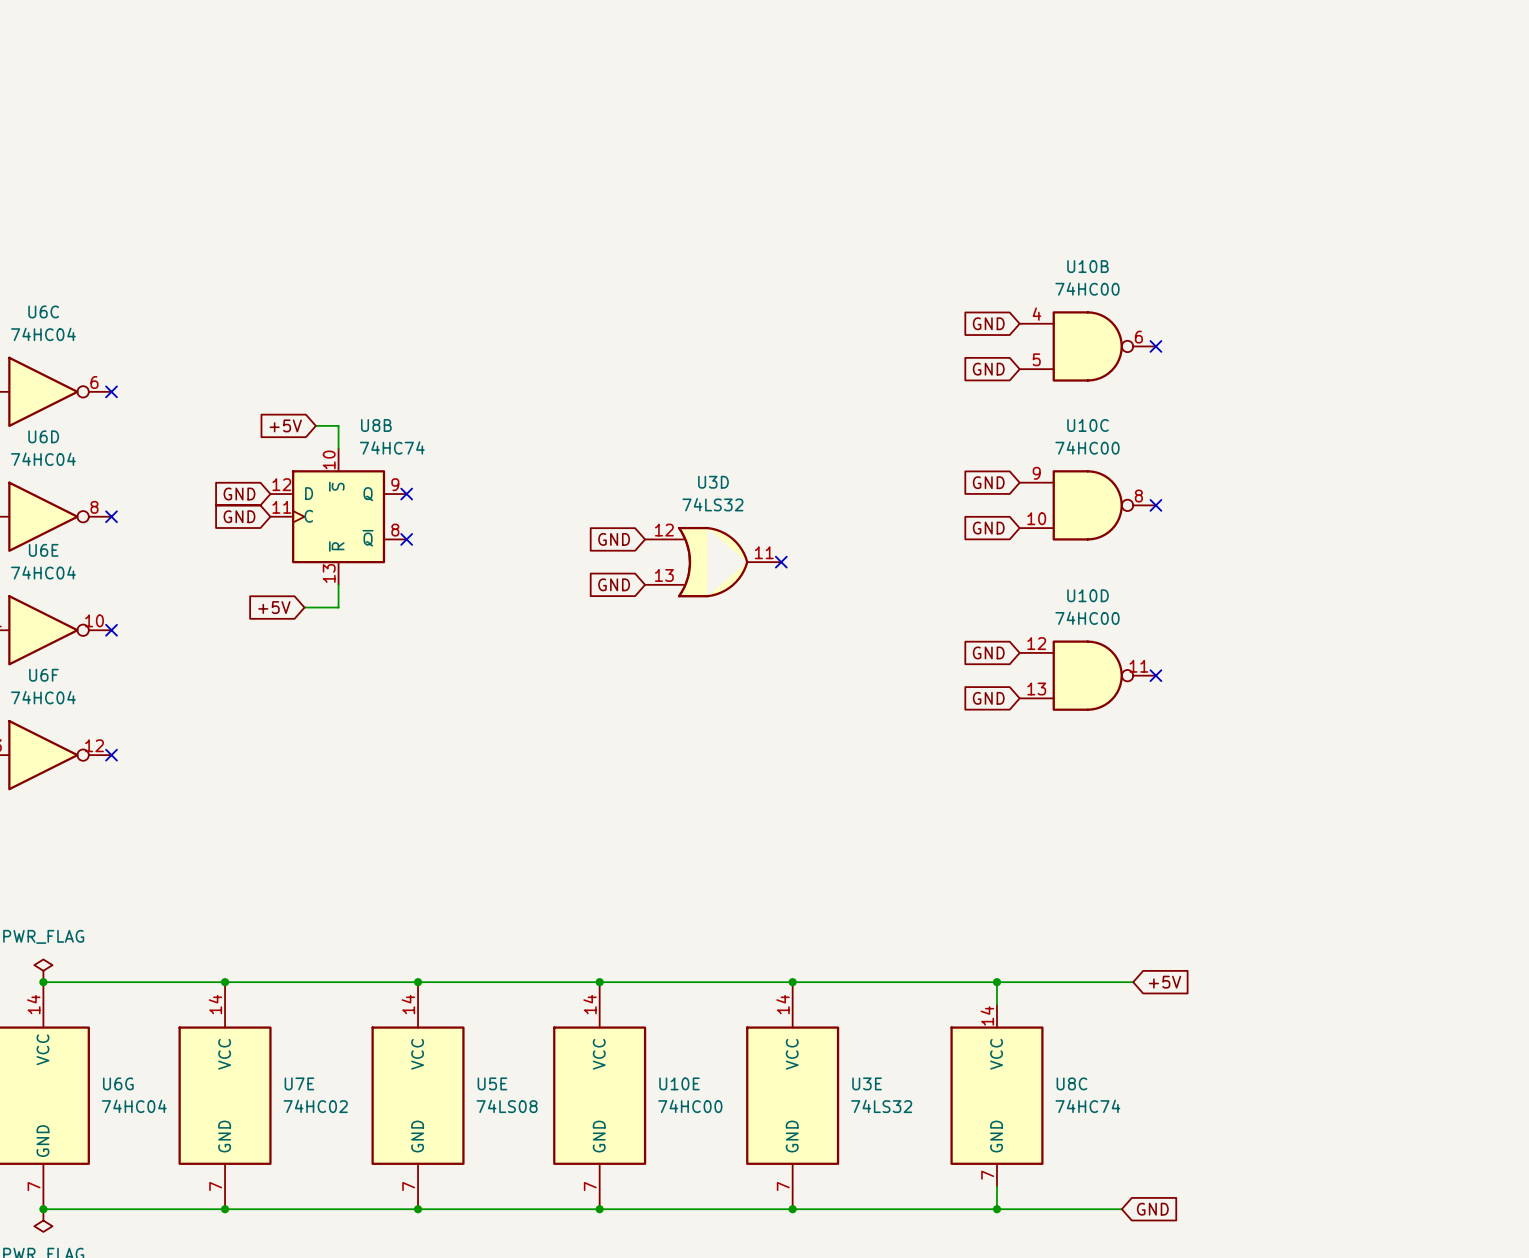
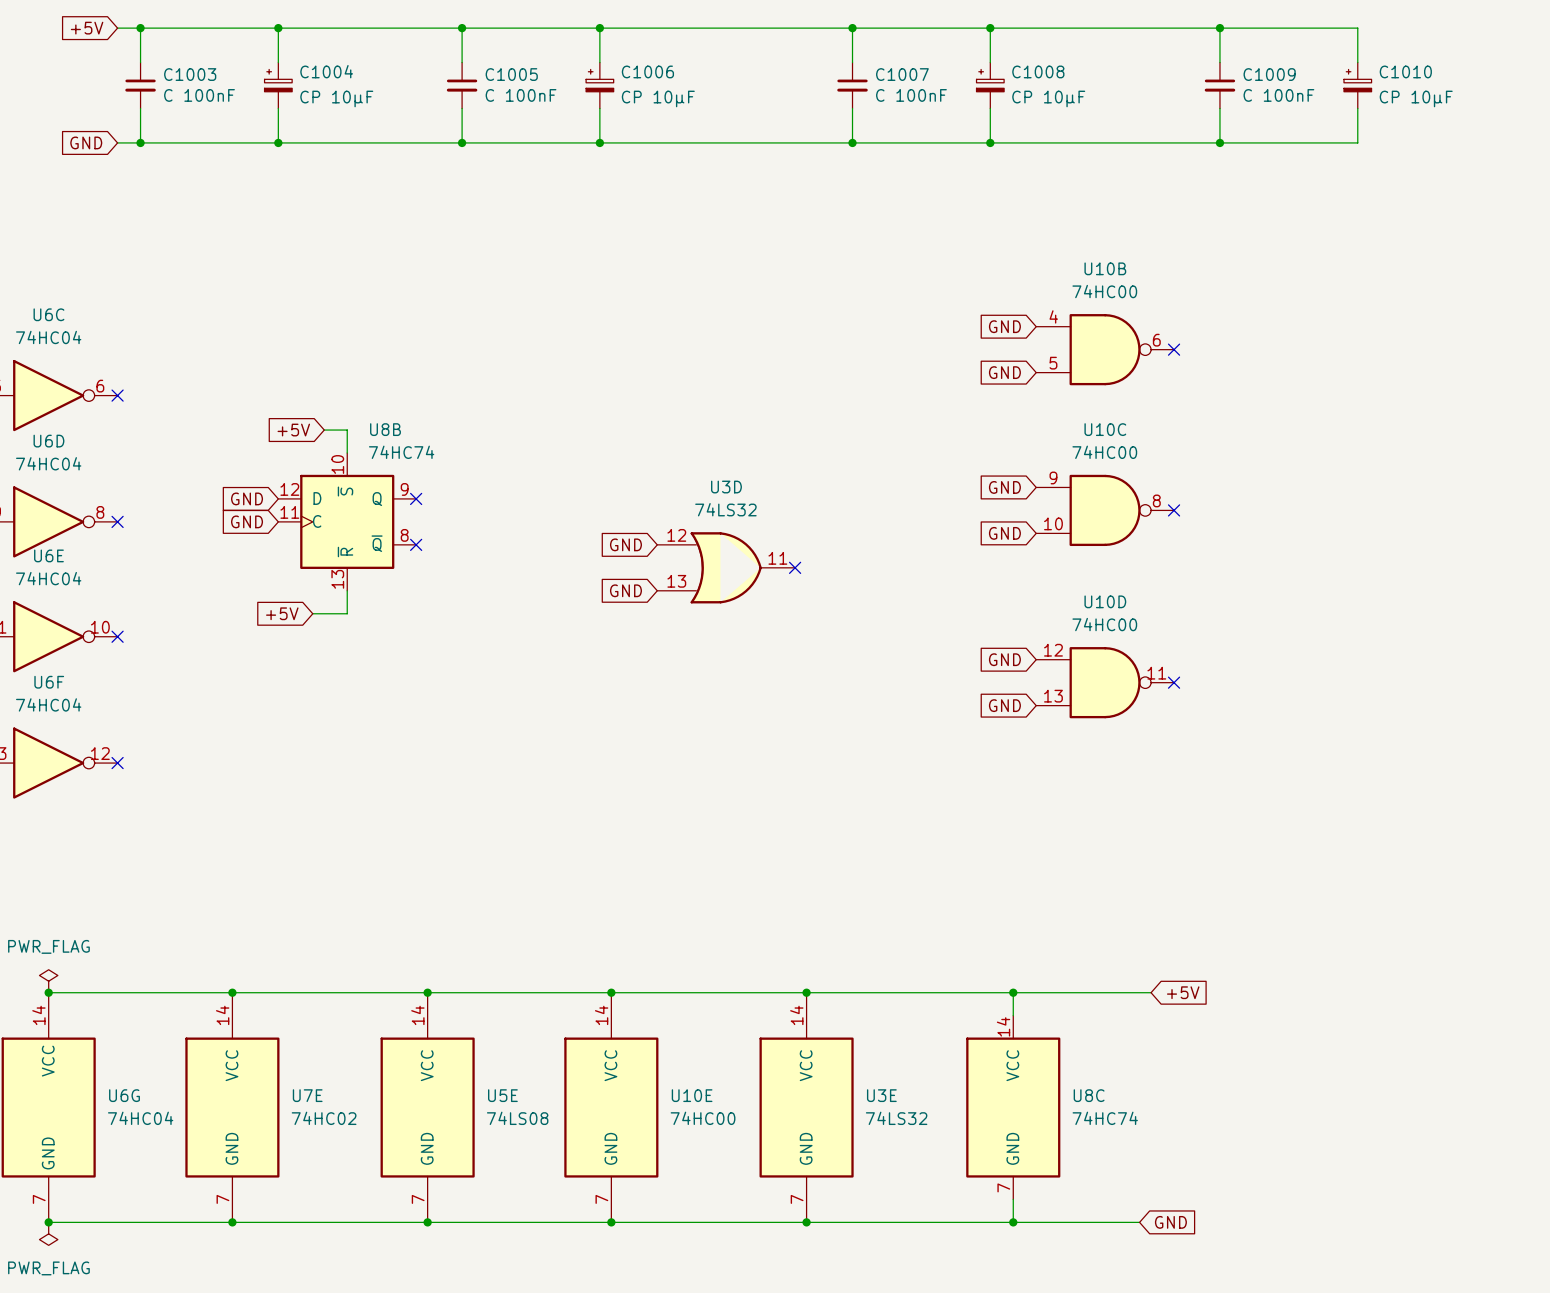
global label: none -> +5V (87, 28)
wire: none -> (117, 28) (1357, 28) (1357, 62)
wire: none -> (140, 28) (140, 62)
junction: none -> (140, 28)
wire: none -> (278, 28) (278, 62)
junction: none -> (278, 28)
wire: none -> (462, 28) (462, 62)
junction: none -> (462, 28)
wire: none -> (599, 28) (599, 62)
junction: none -> (599, 28)
wire: none -> (852, 28) (852, 62)
junction: none -> (852, 28)
wire: none -> (990, 28) (990, 62)
junction: none -> (990, 28)
wire: none -> (1219, 28) (1219, 62)
junction: none -> (1219, 28)
C1003: none -> C 100nF (140, 85)
C1004: none -> CP 10μF (278, 85)
C1005: none -> C 100nF (462, 85)
C1006: none -> CP 10μF (599, 85)
C1007: none -> C 100nF (852, 85)
C1008: none -> CP 10μF (990, 85)
C1009: none -> C 100nF (1219, 85)
C1010: none -> CP 10μF (1357, 85)
wire: none -> (140, 108) (140, 142)
wire: none -> (278, 108) (278, 142)
wire: none -> (462, 108) (462, 142)
wire: none -> (599, 108) (599, 142)
wire: none -> (852, 108) (852, 142)
wire: none -> (990, 108) (990, 142)
wire: none -> (1219, 108) (1219, 142)
wire: none -> (1357, 108) (1357, 142) (117, 142)
global label: none -> GND (86, 142)
junction: none -> (140, 142)
junction: none -> (278, 142)
junction: none -> (462, 142)
junction: none -> (599, 142)
junction: none -> (852, 142)
junction: none -> (990, 142)
junction: none -> (1219, 142)

